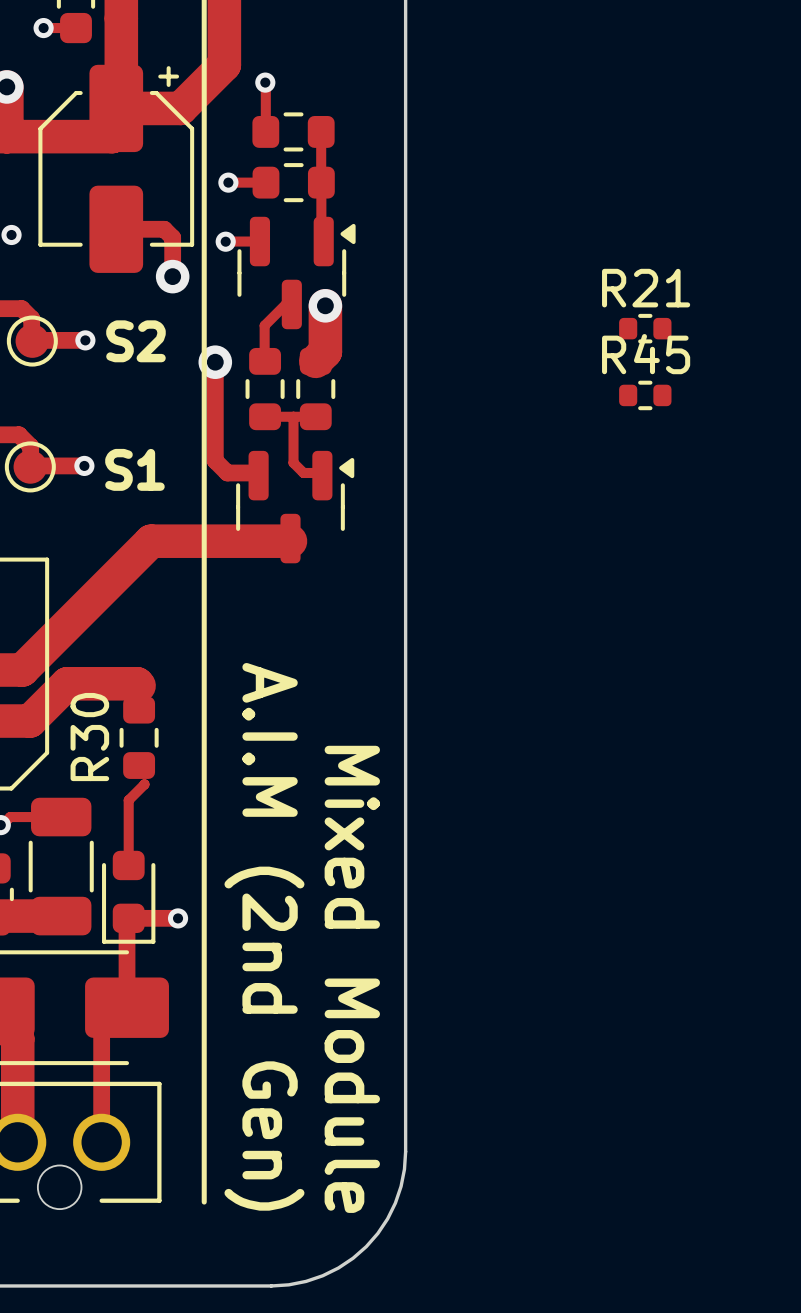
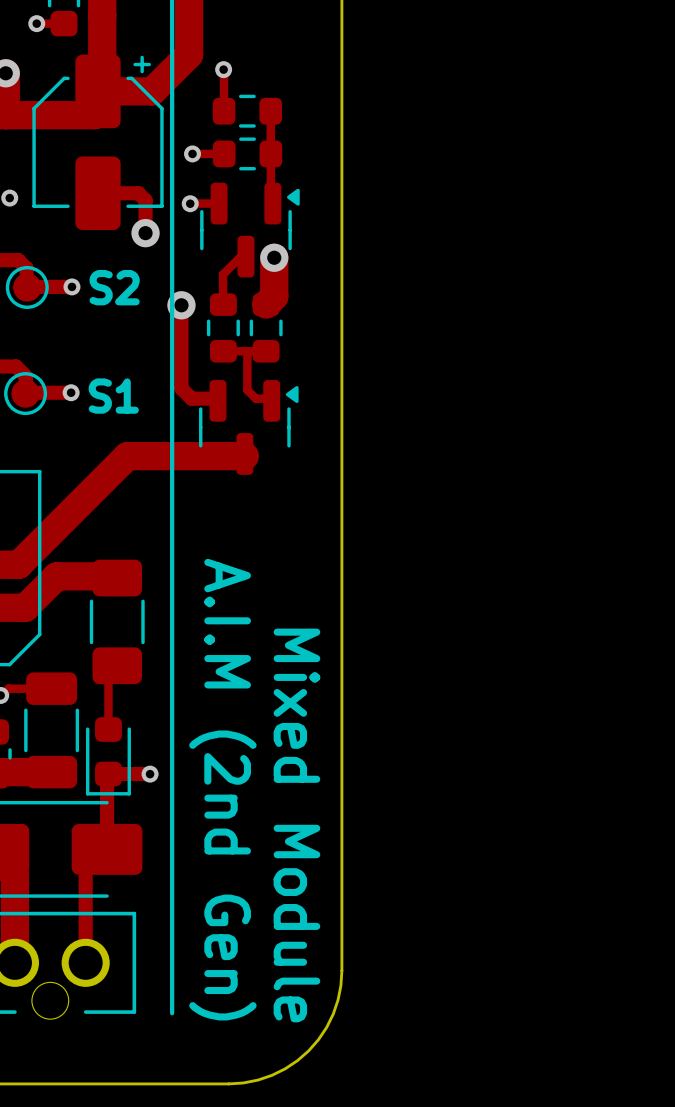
R21: (645, 328) -> none
R45: (645, 395) -> none
R30: (139, 737) -> none
part: none -> (117, 621)

